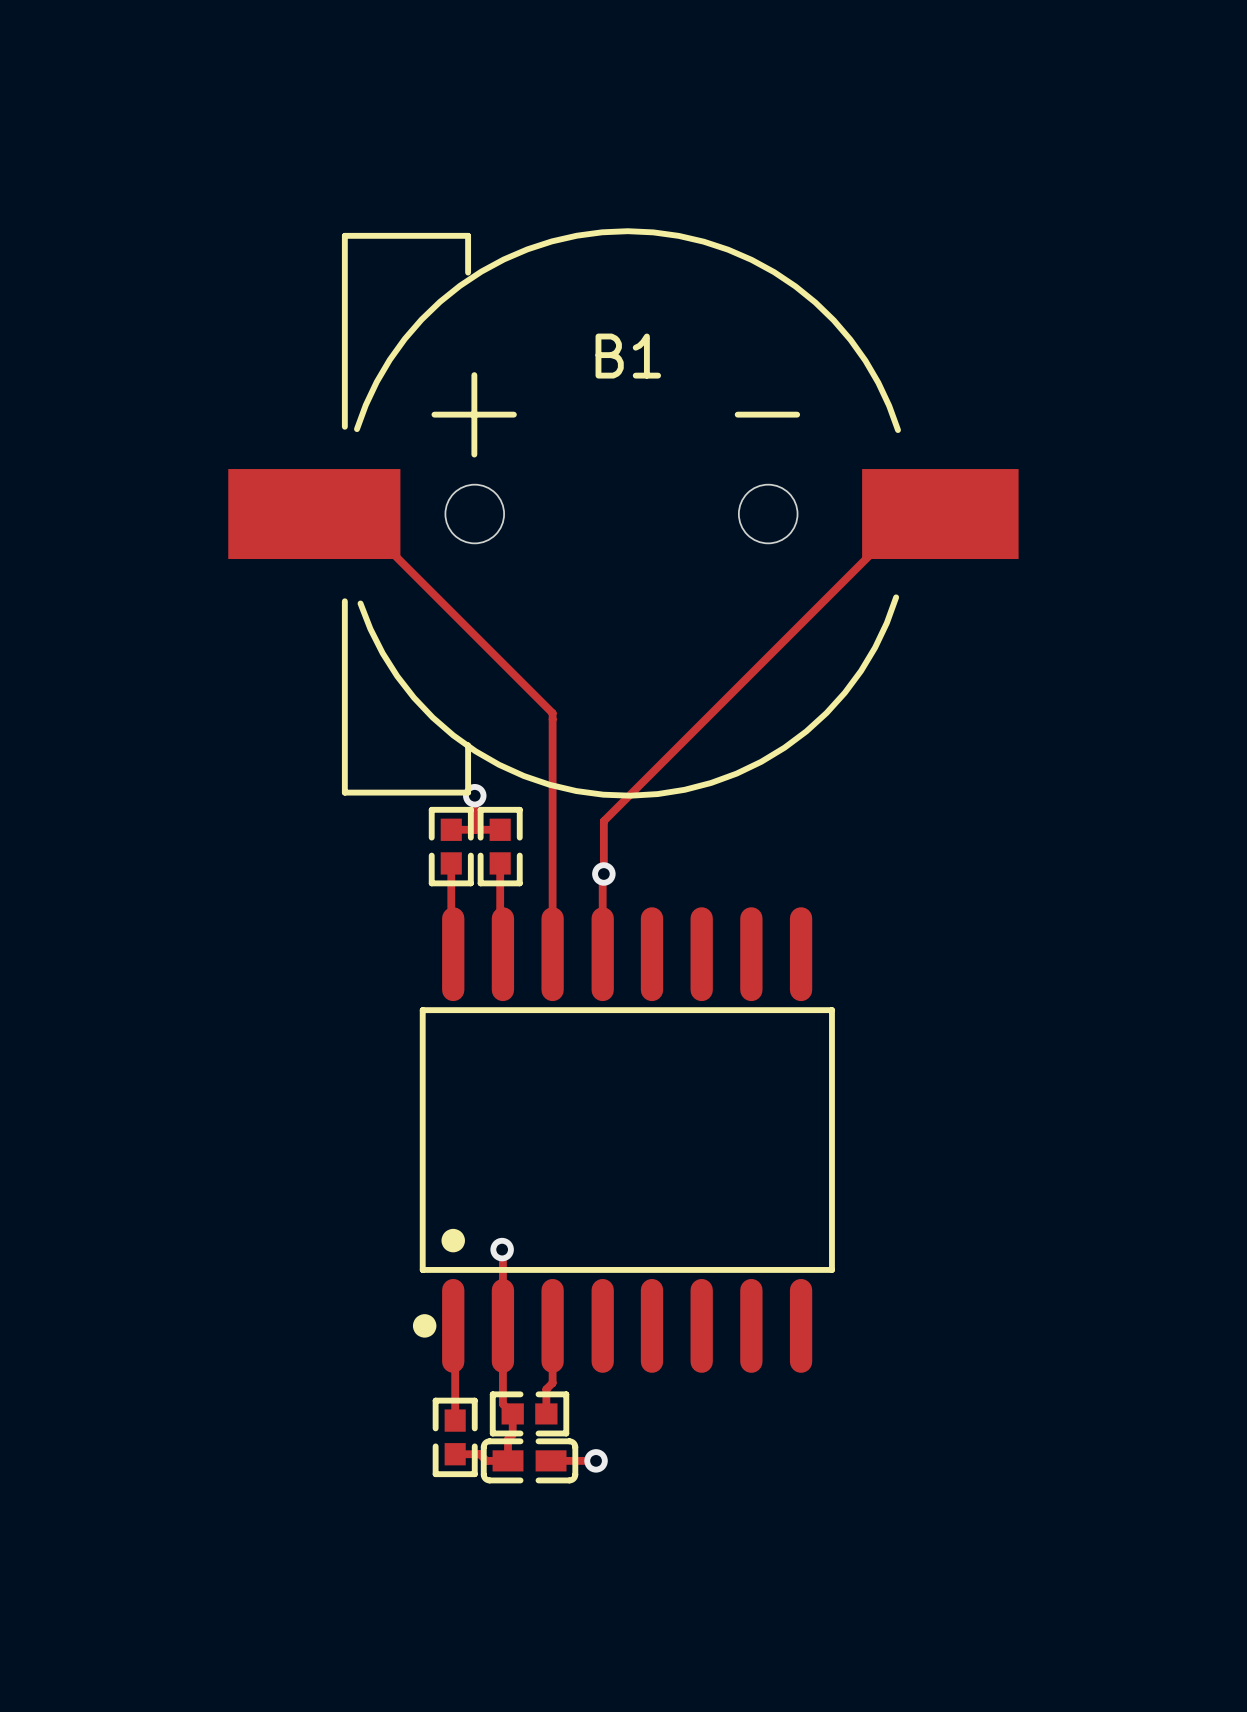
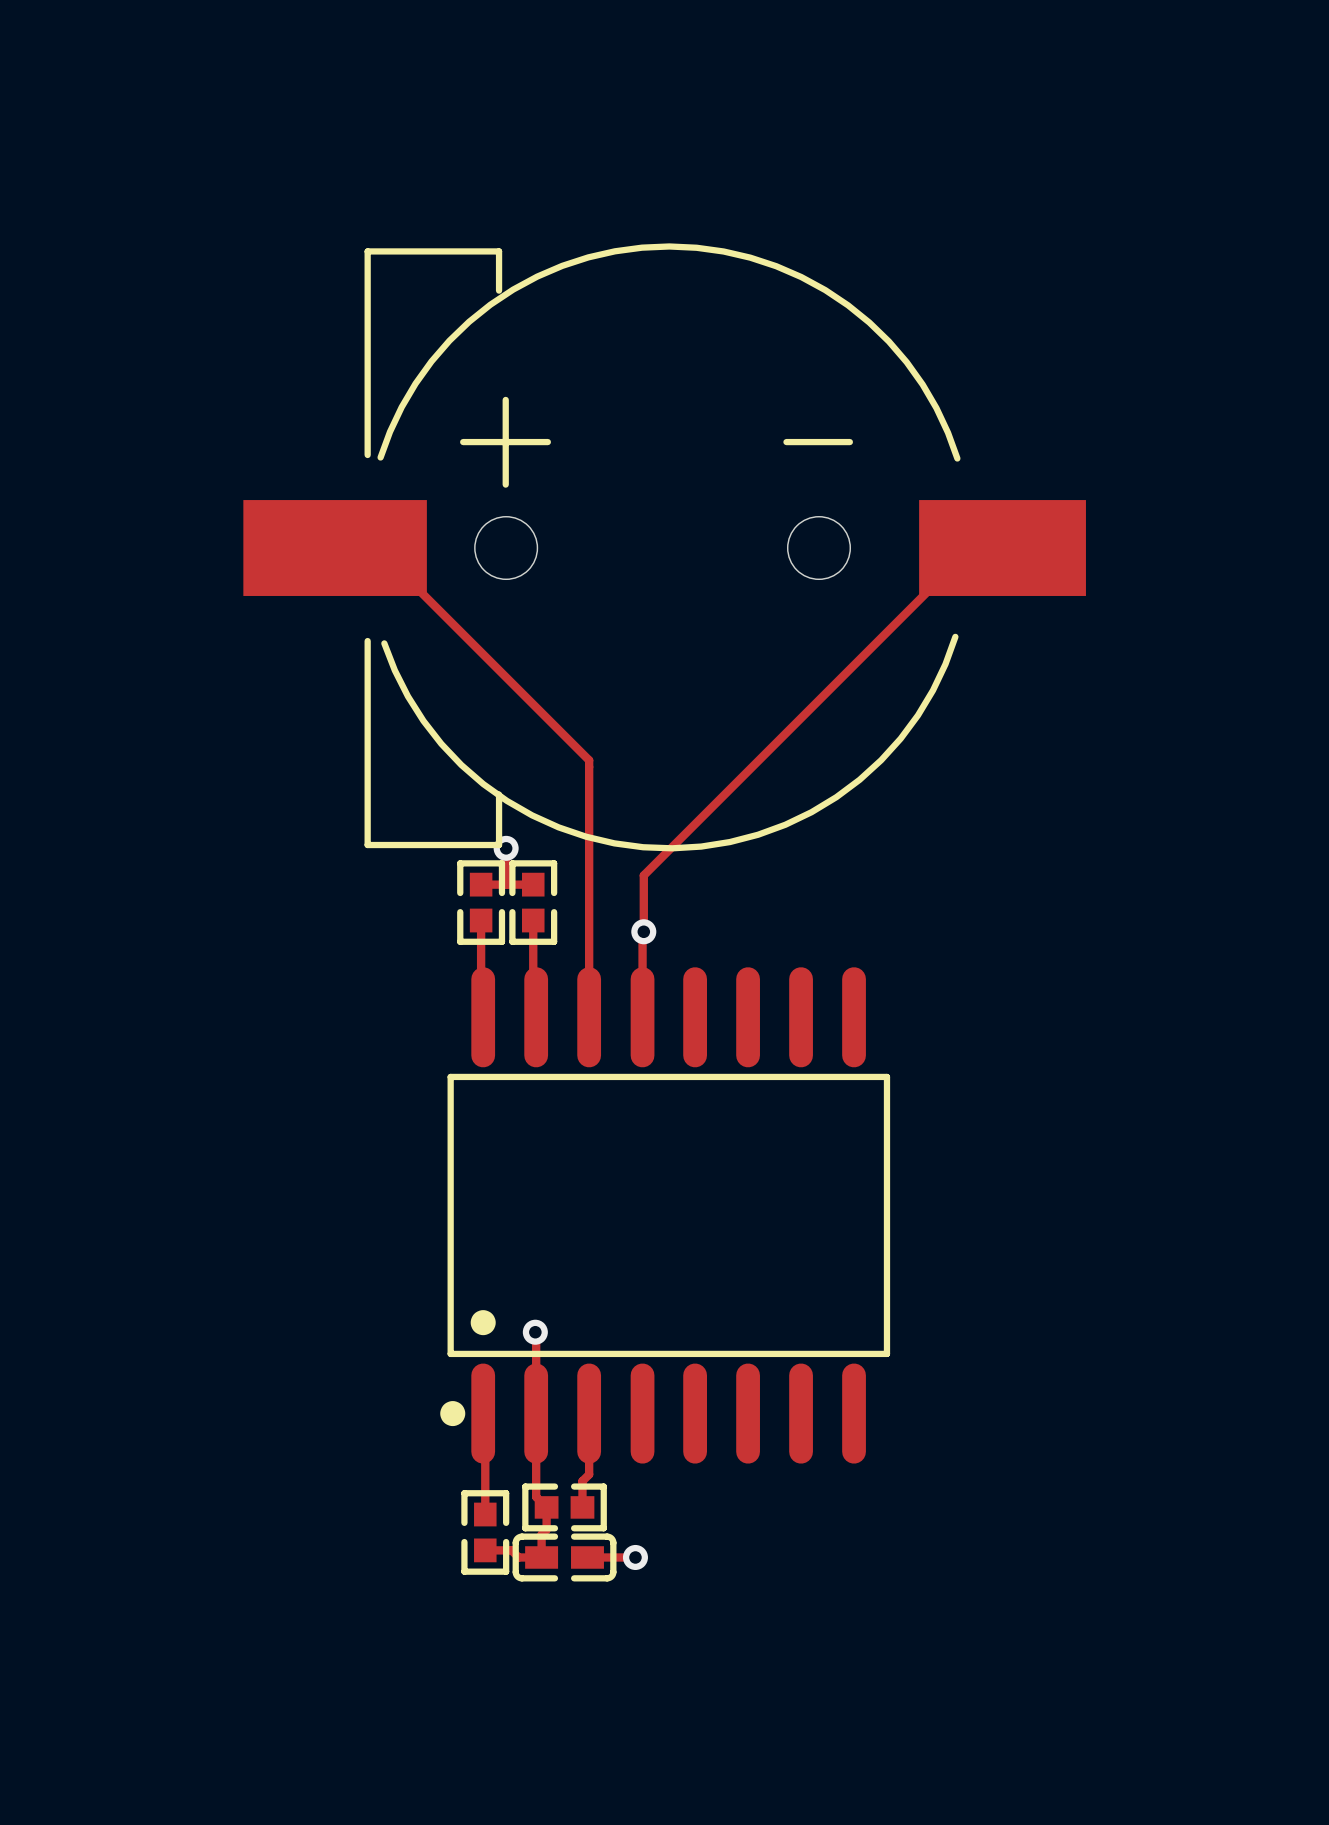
B1 name: B1 (628, 356) -> none

